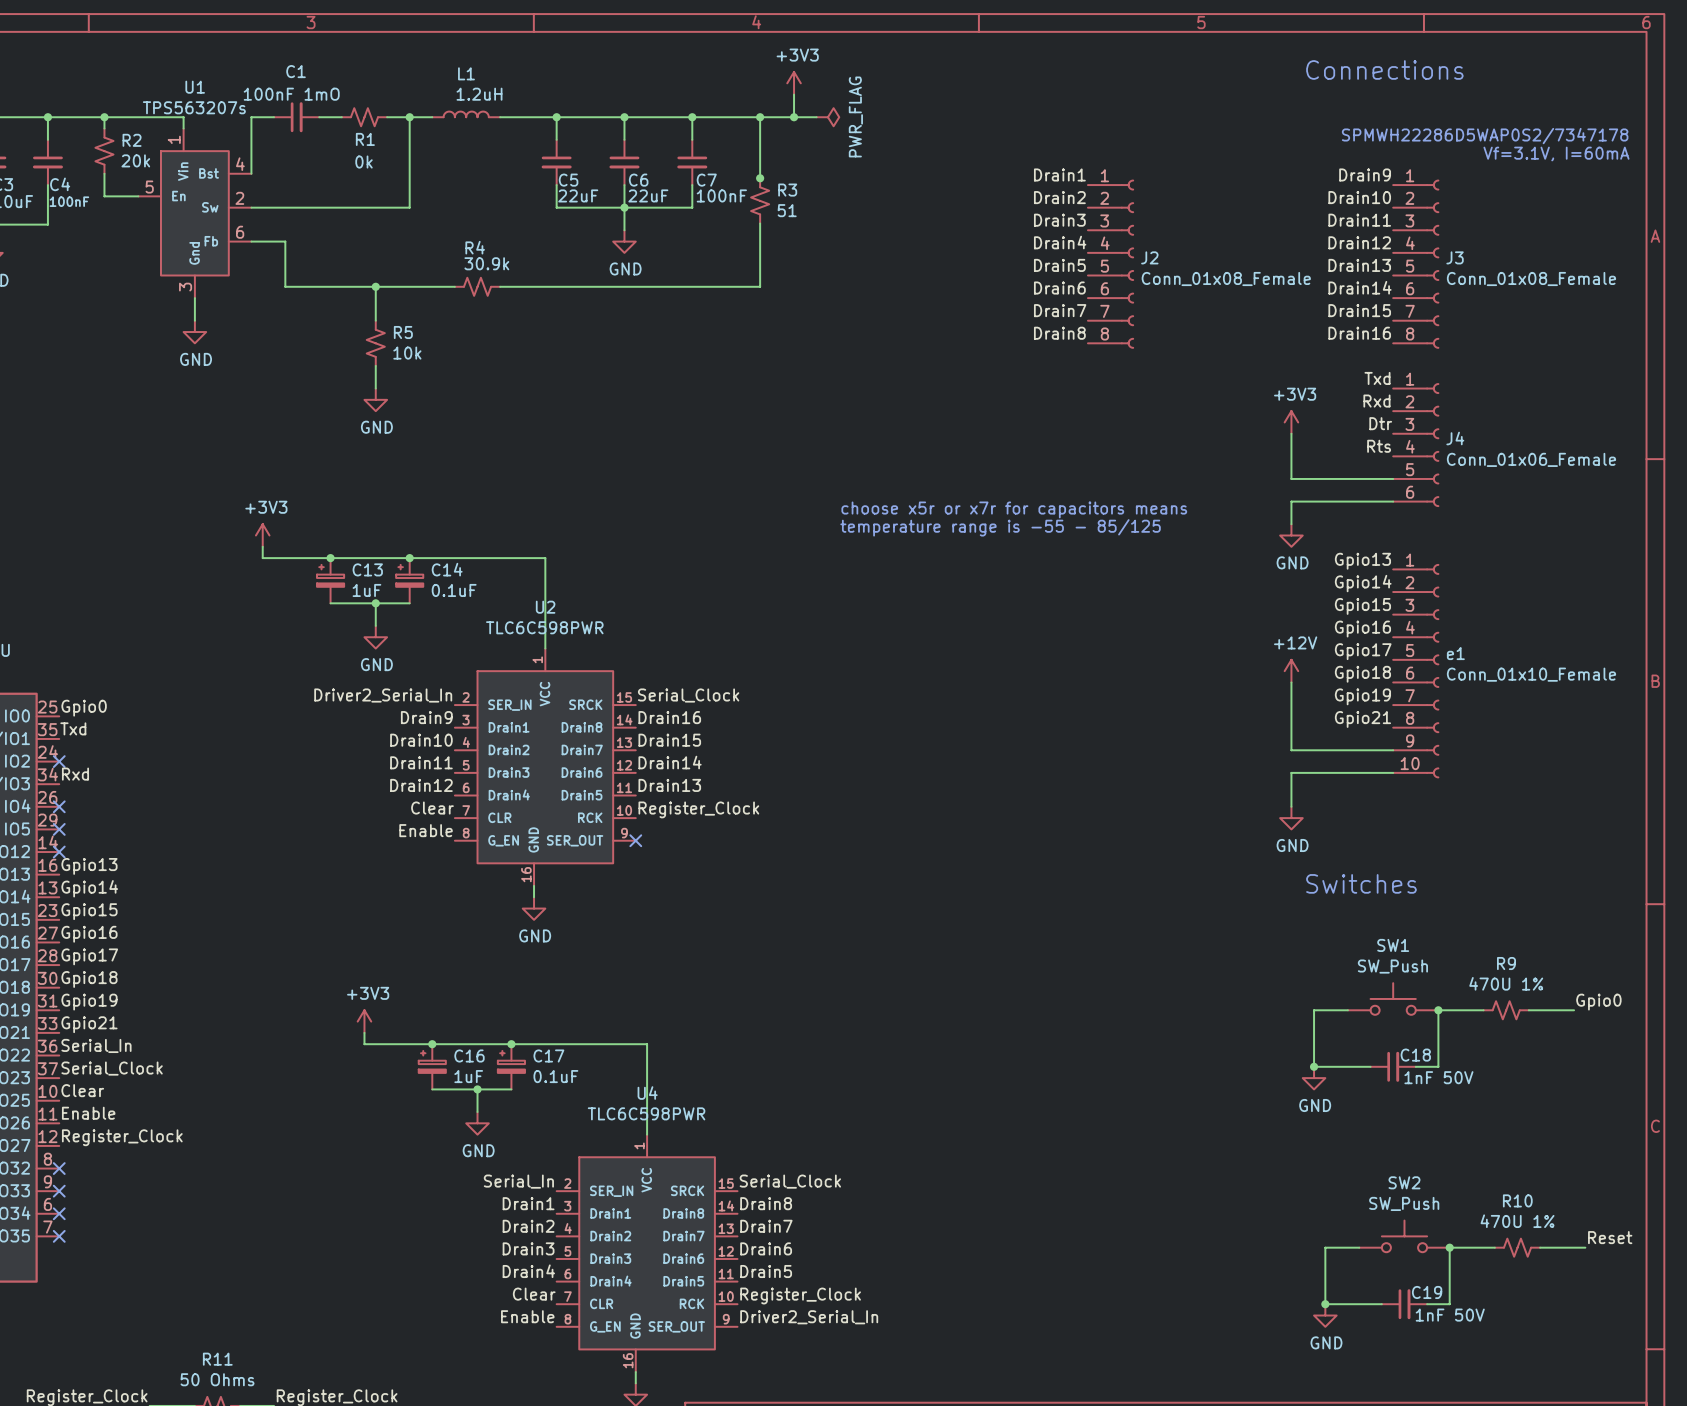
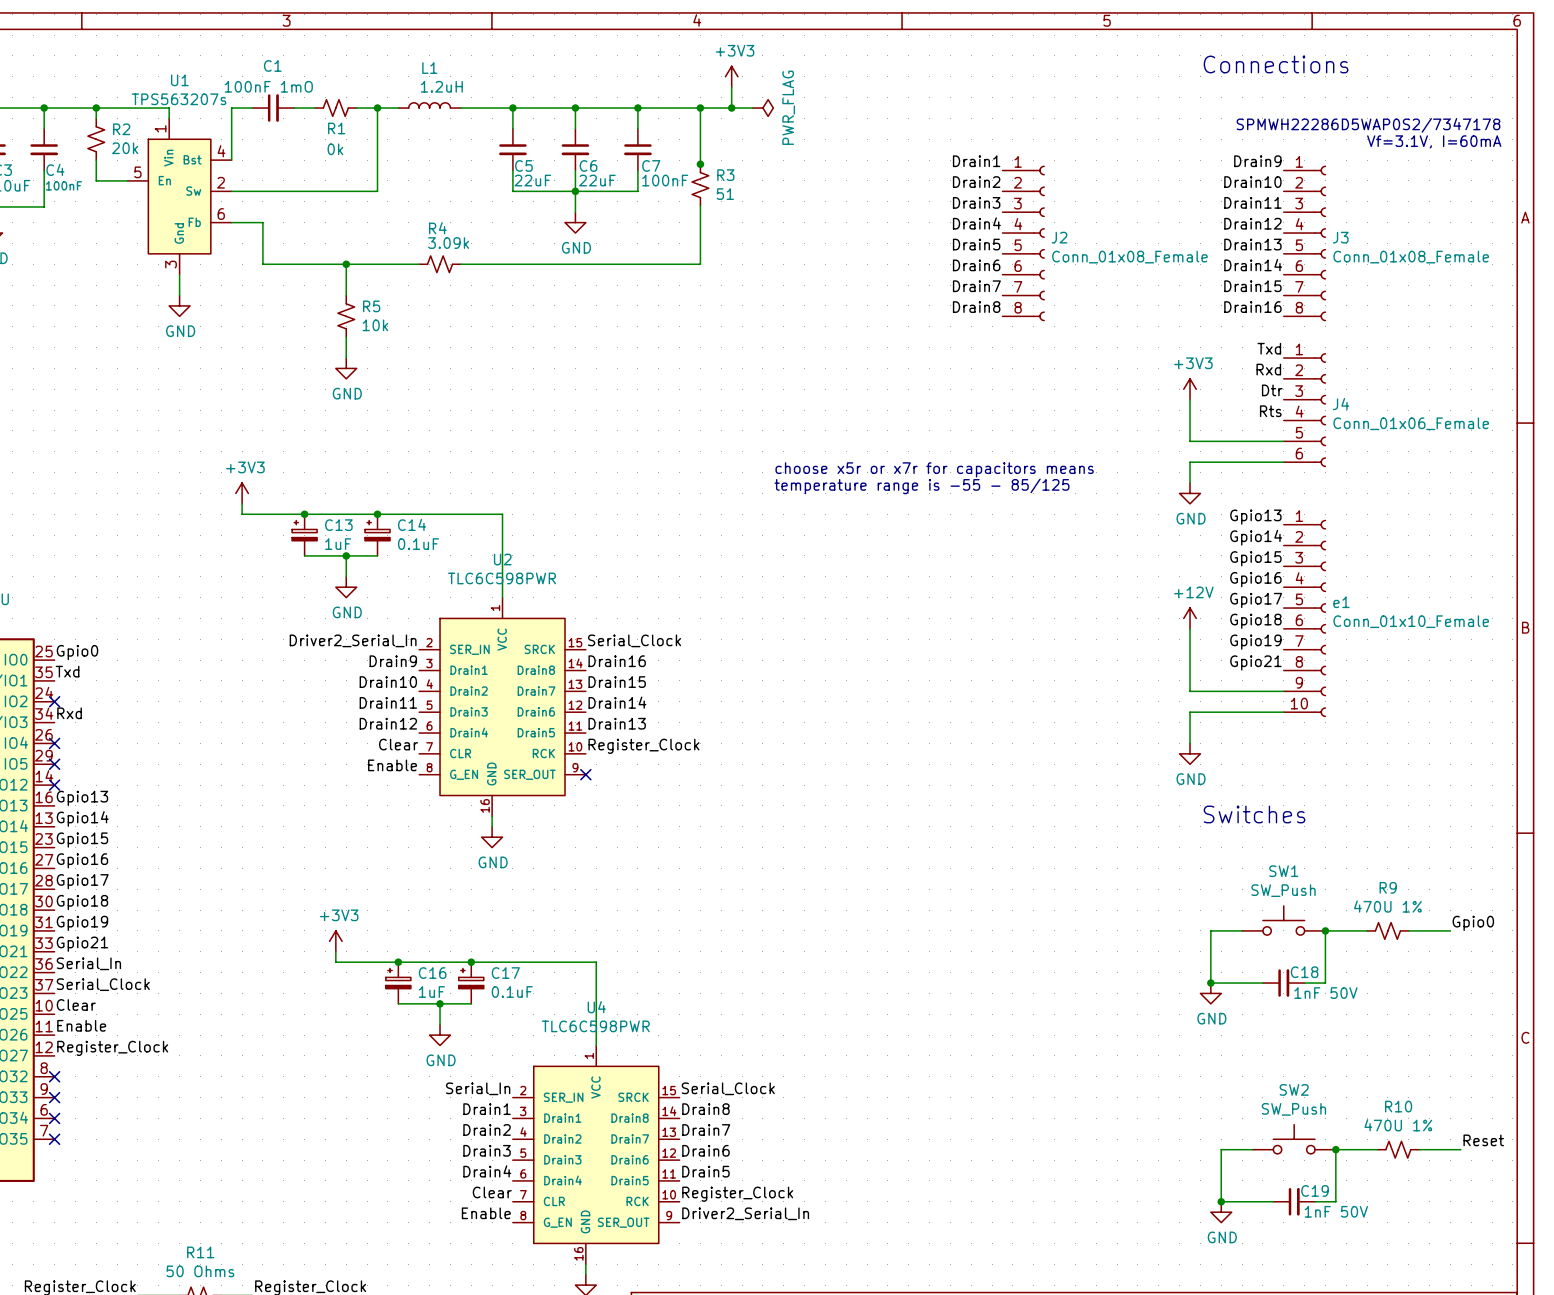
R4 value: 30.9k (486, 263) -> 3.09k (448, 243)

